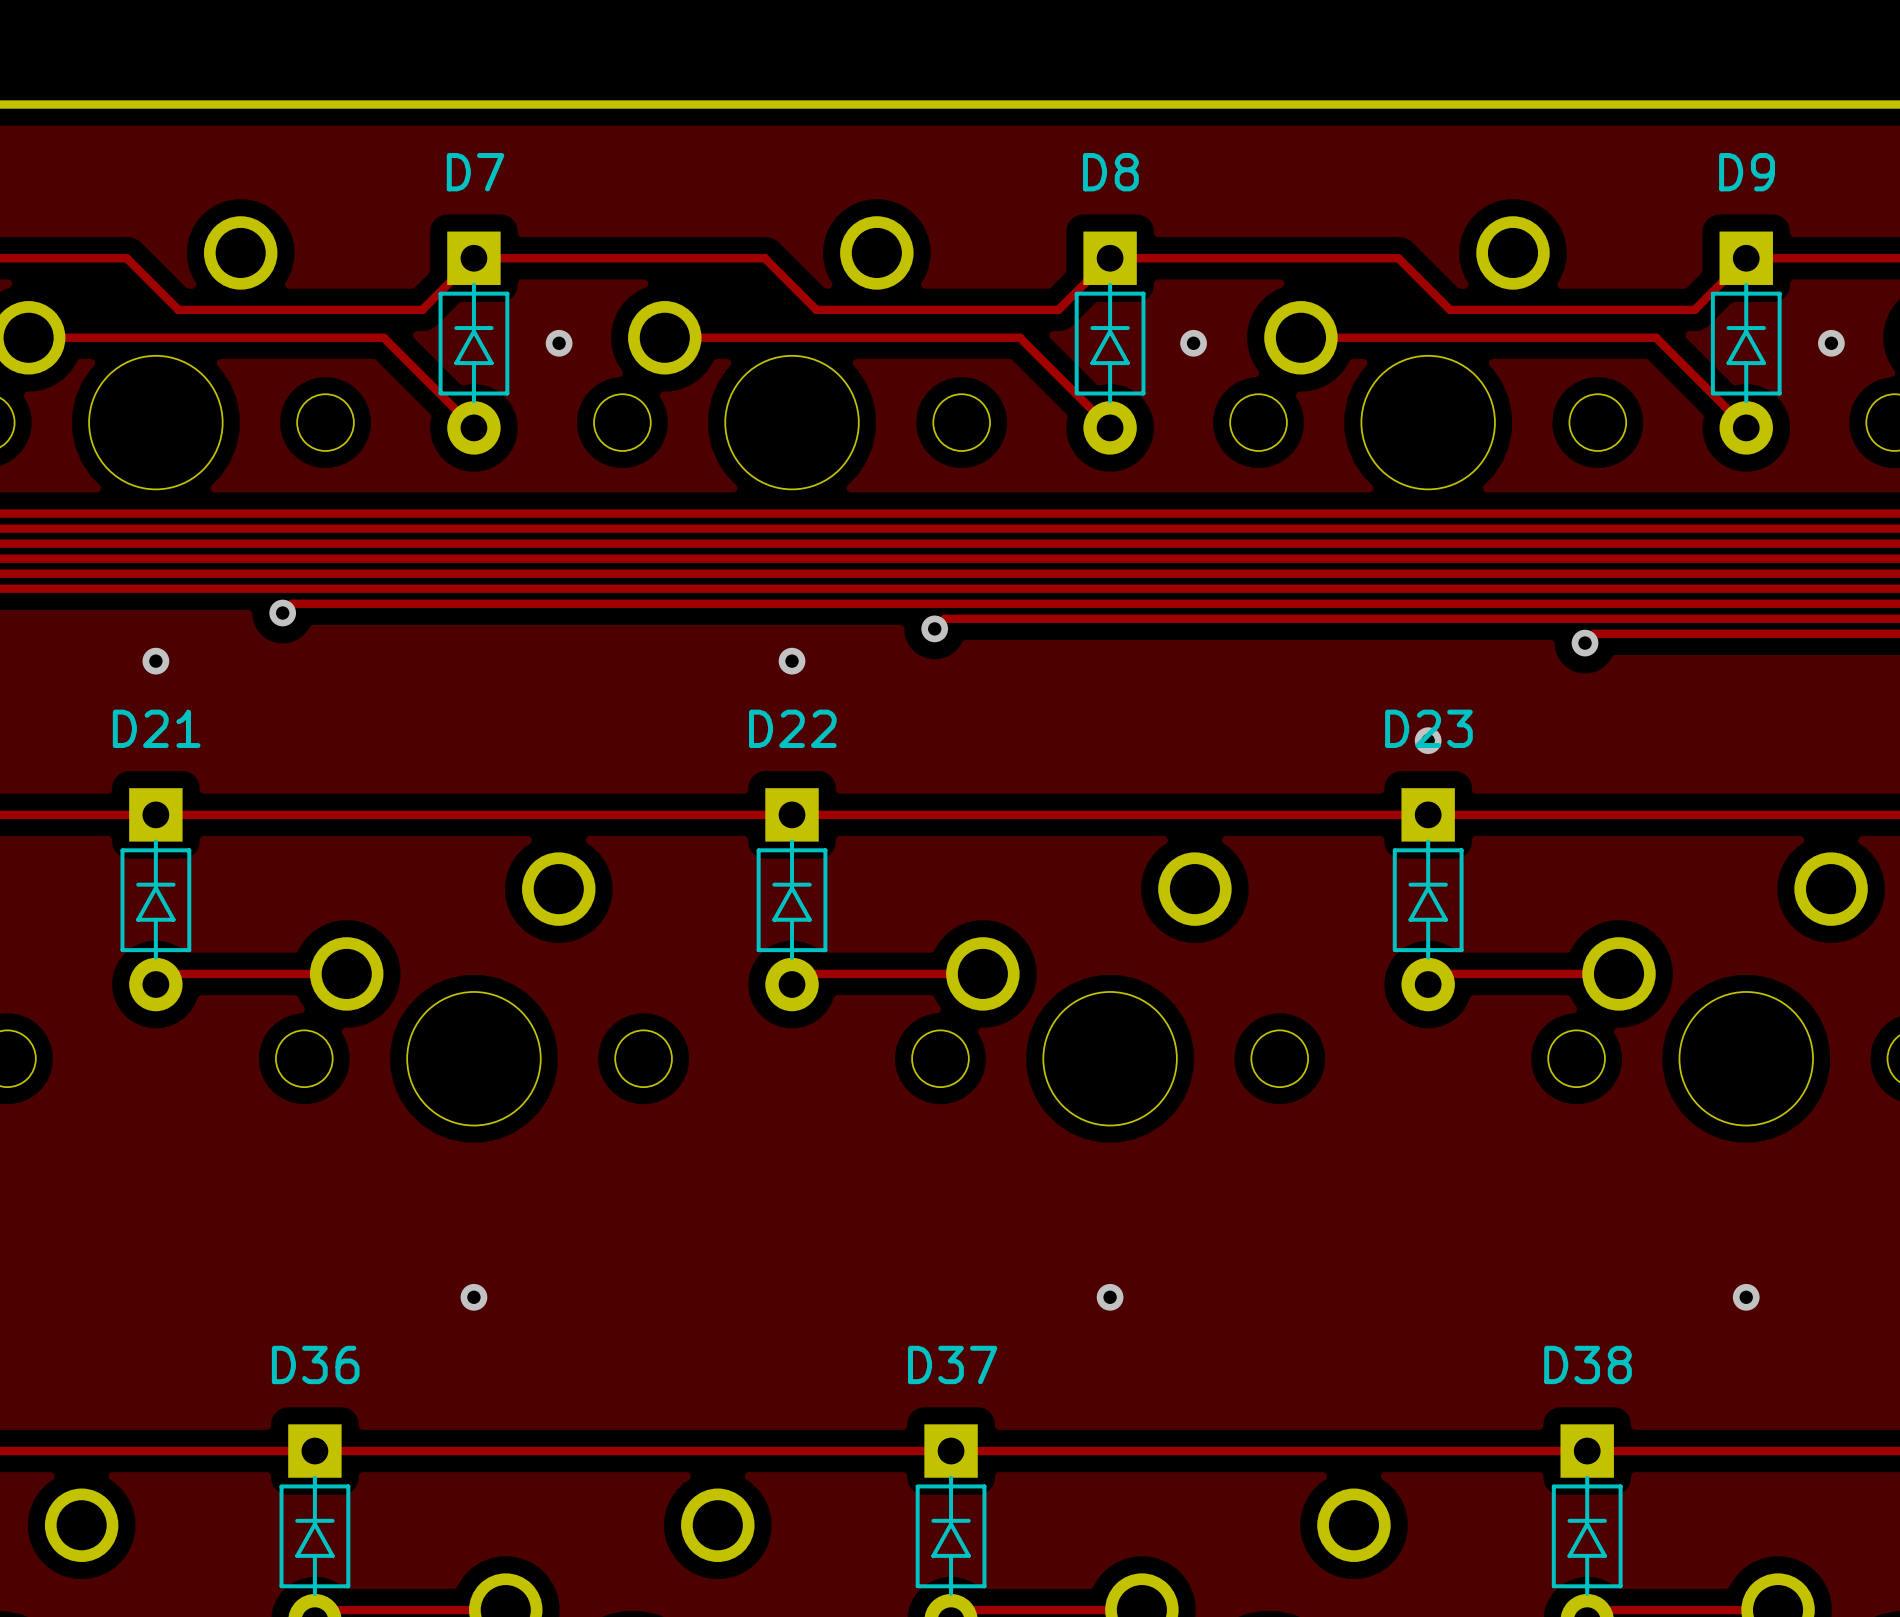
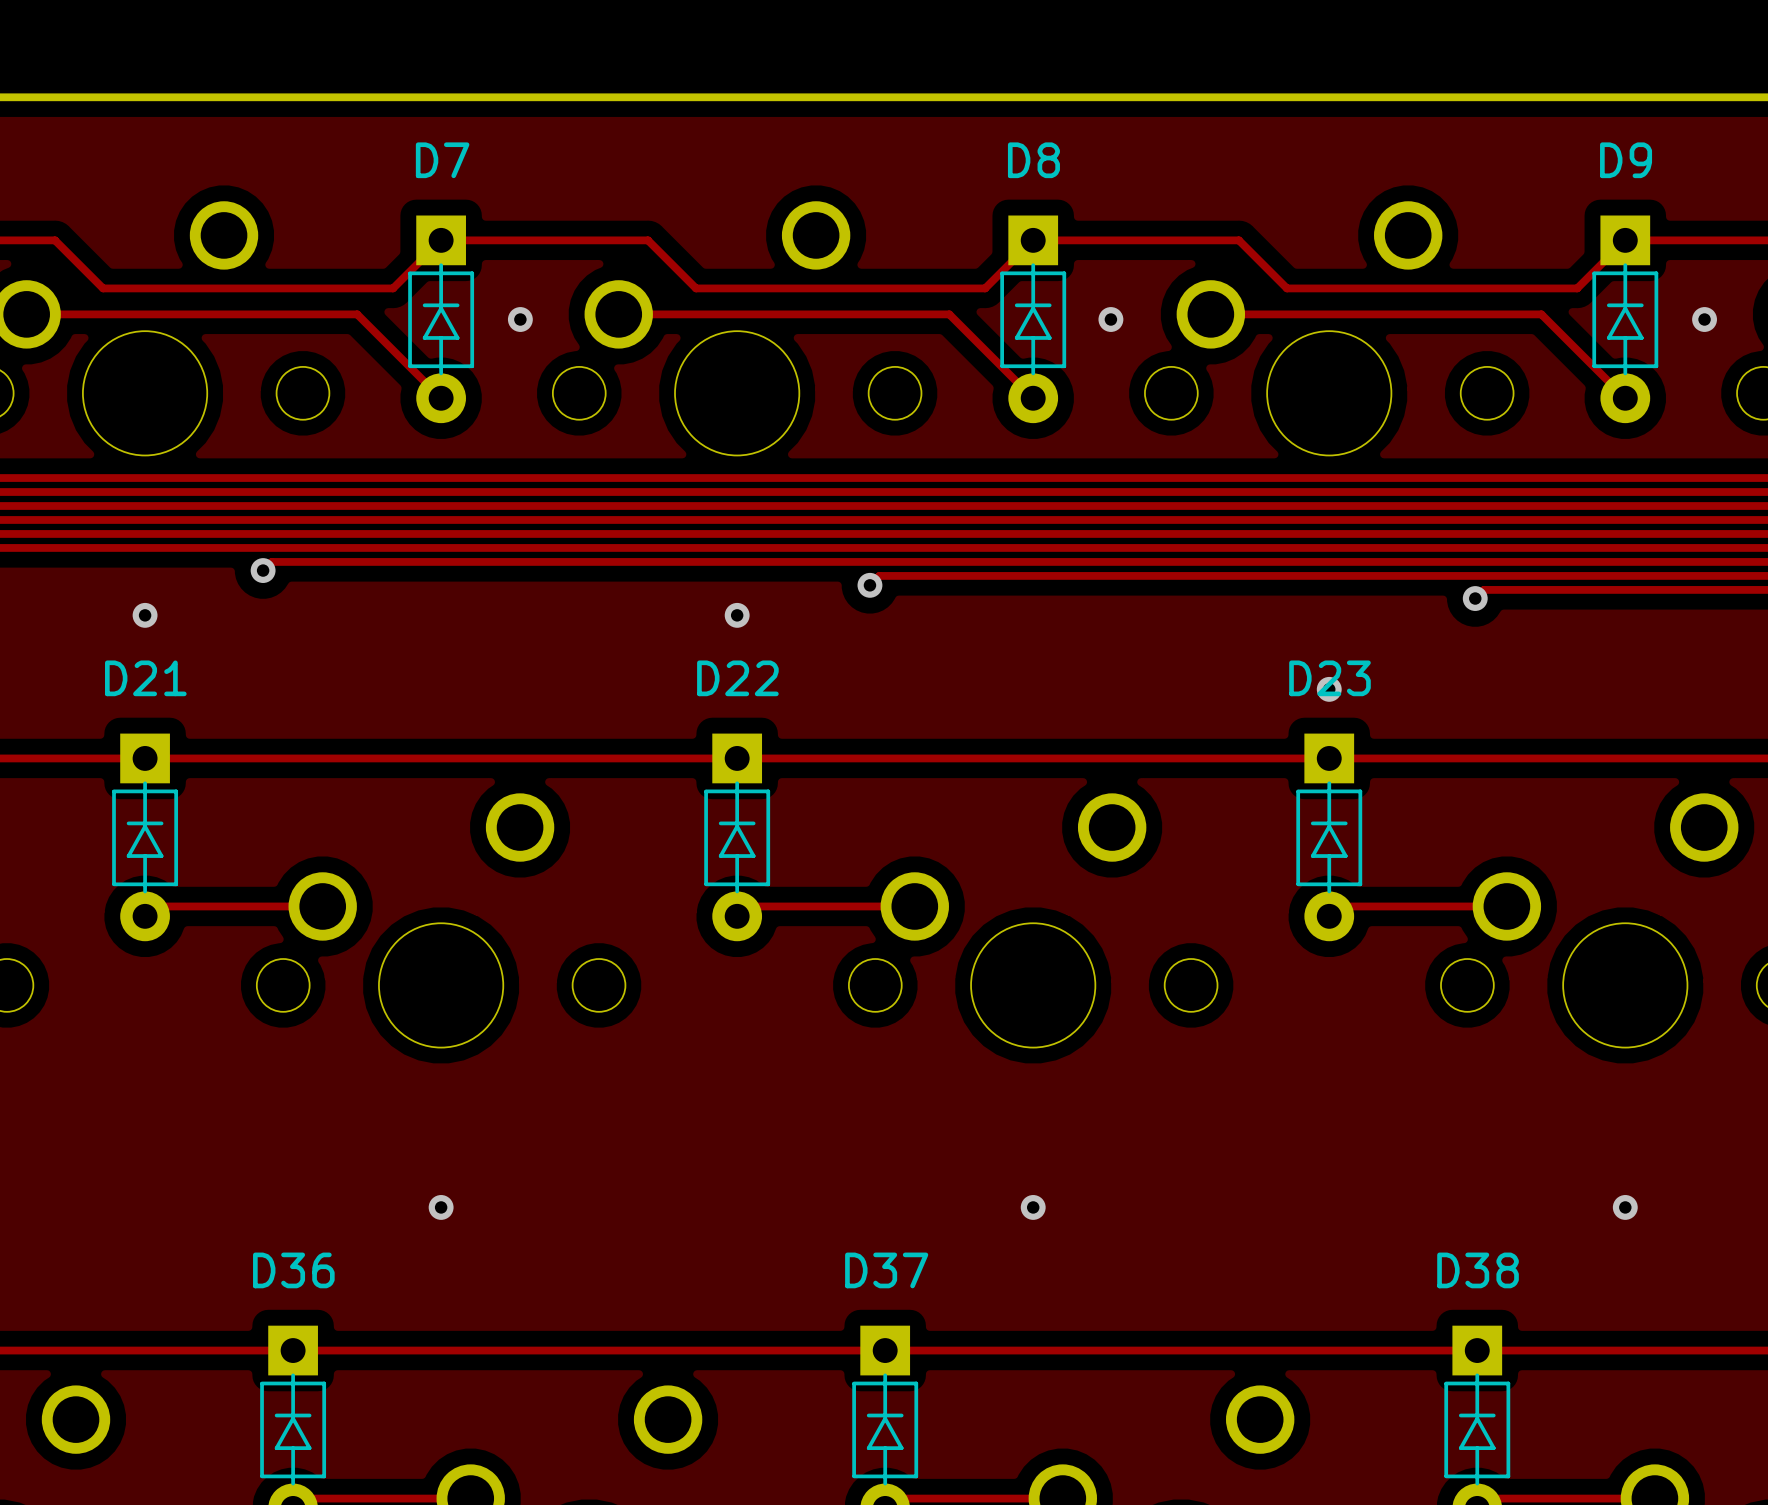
track: (59, 258) (126, 258) (178, 309) -> (55, 240) (103, 288) (166, 288)
track: (696, 258) (764, 258) (816, 309) -> (648, 240) (696, 288) (759, 288)
track: (1331, 258) (1398, 258) (1450, 309) -> (1238, 240) (1286, 288) (1349, 288)

